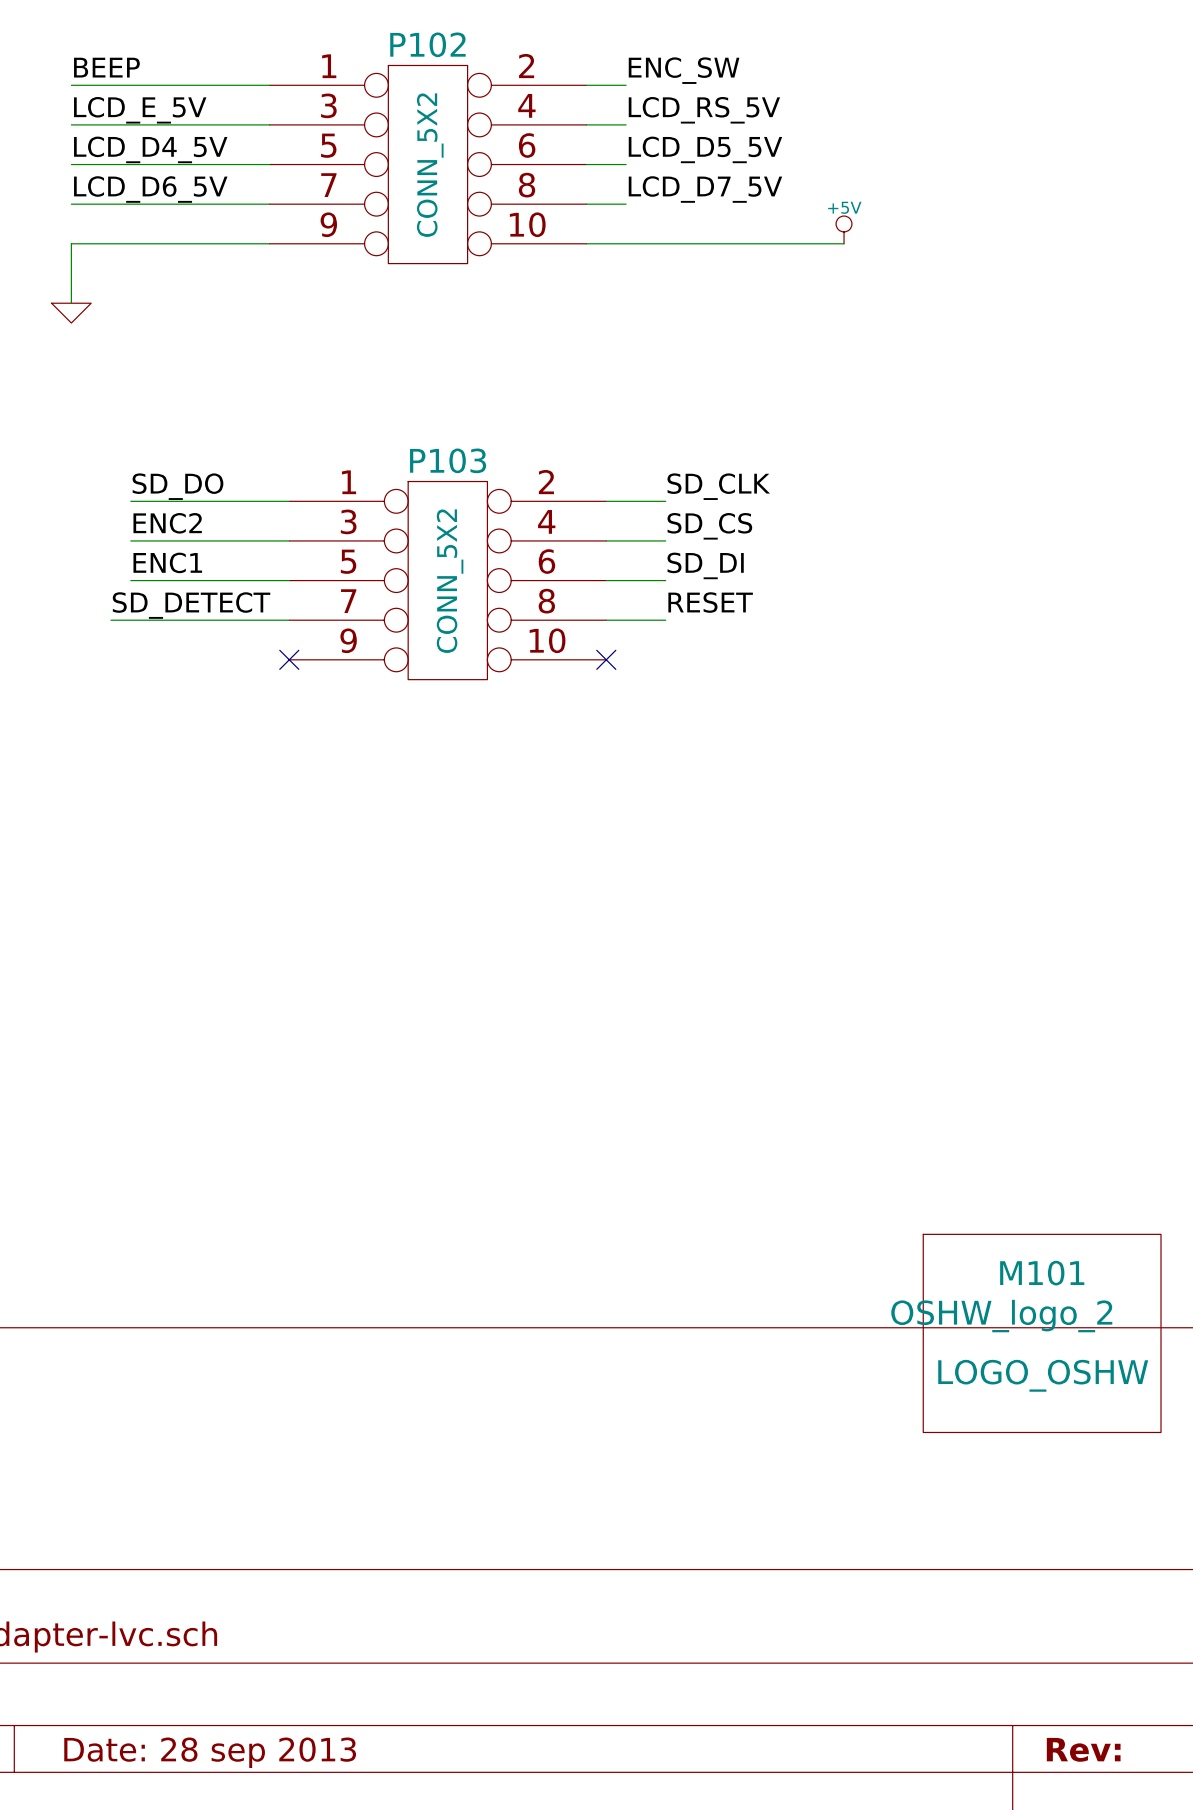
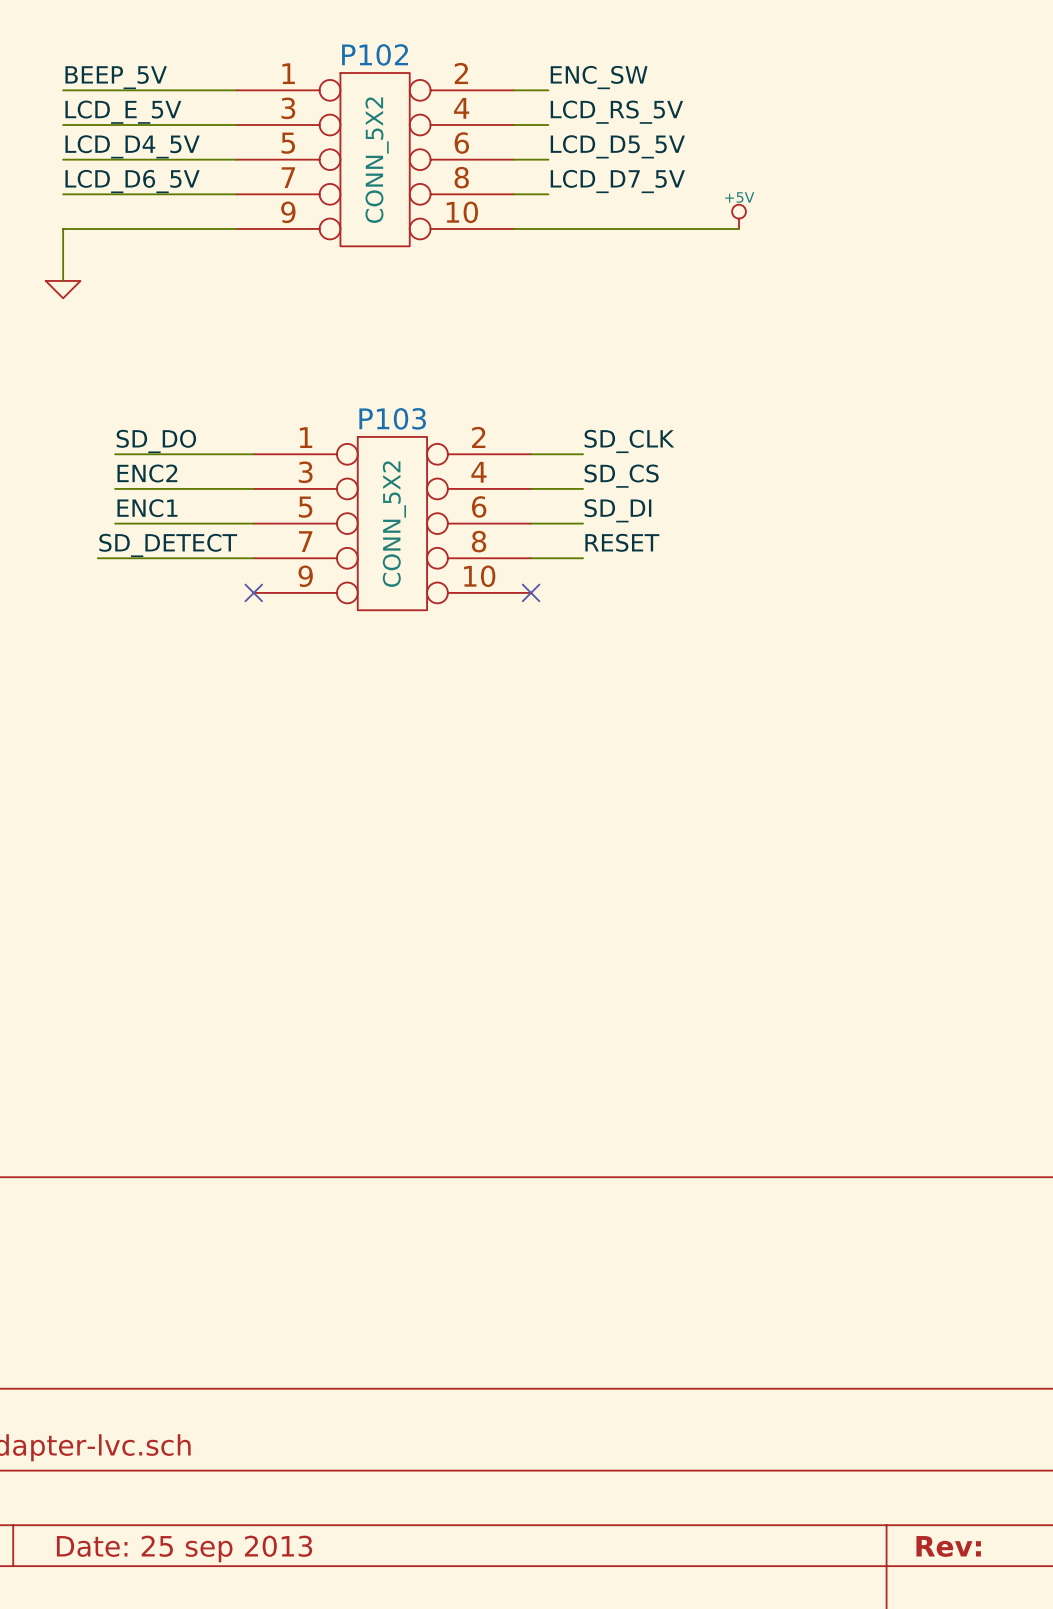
label: BEEP (106, 67) -> BEEP_5V (116, 77)
M101: LOGO_OSHW (1042, 1333) -> none
title block: Date: 28 sep 2013 (210, 1752) -> Date: 25 sep 2013 (184, 1549)

